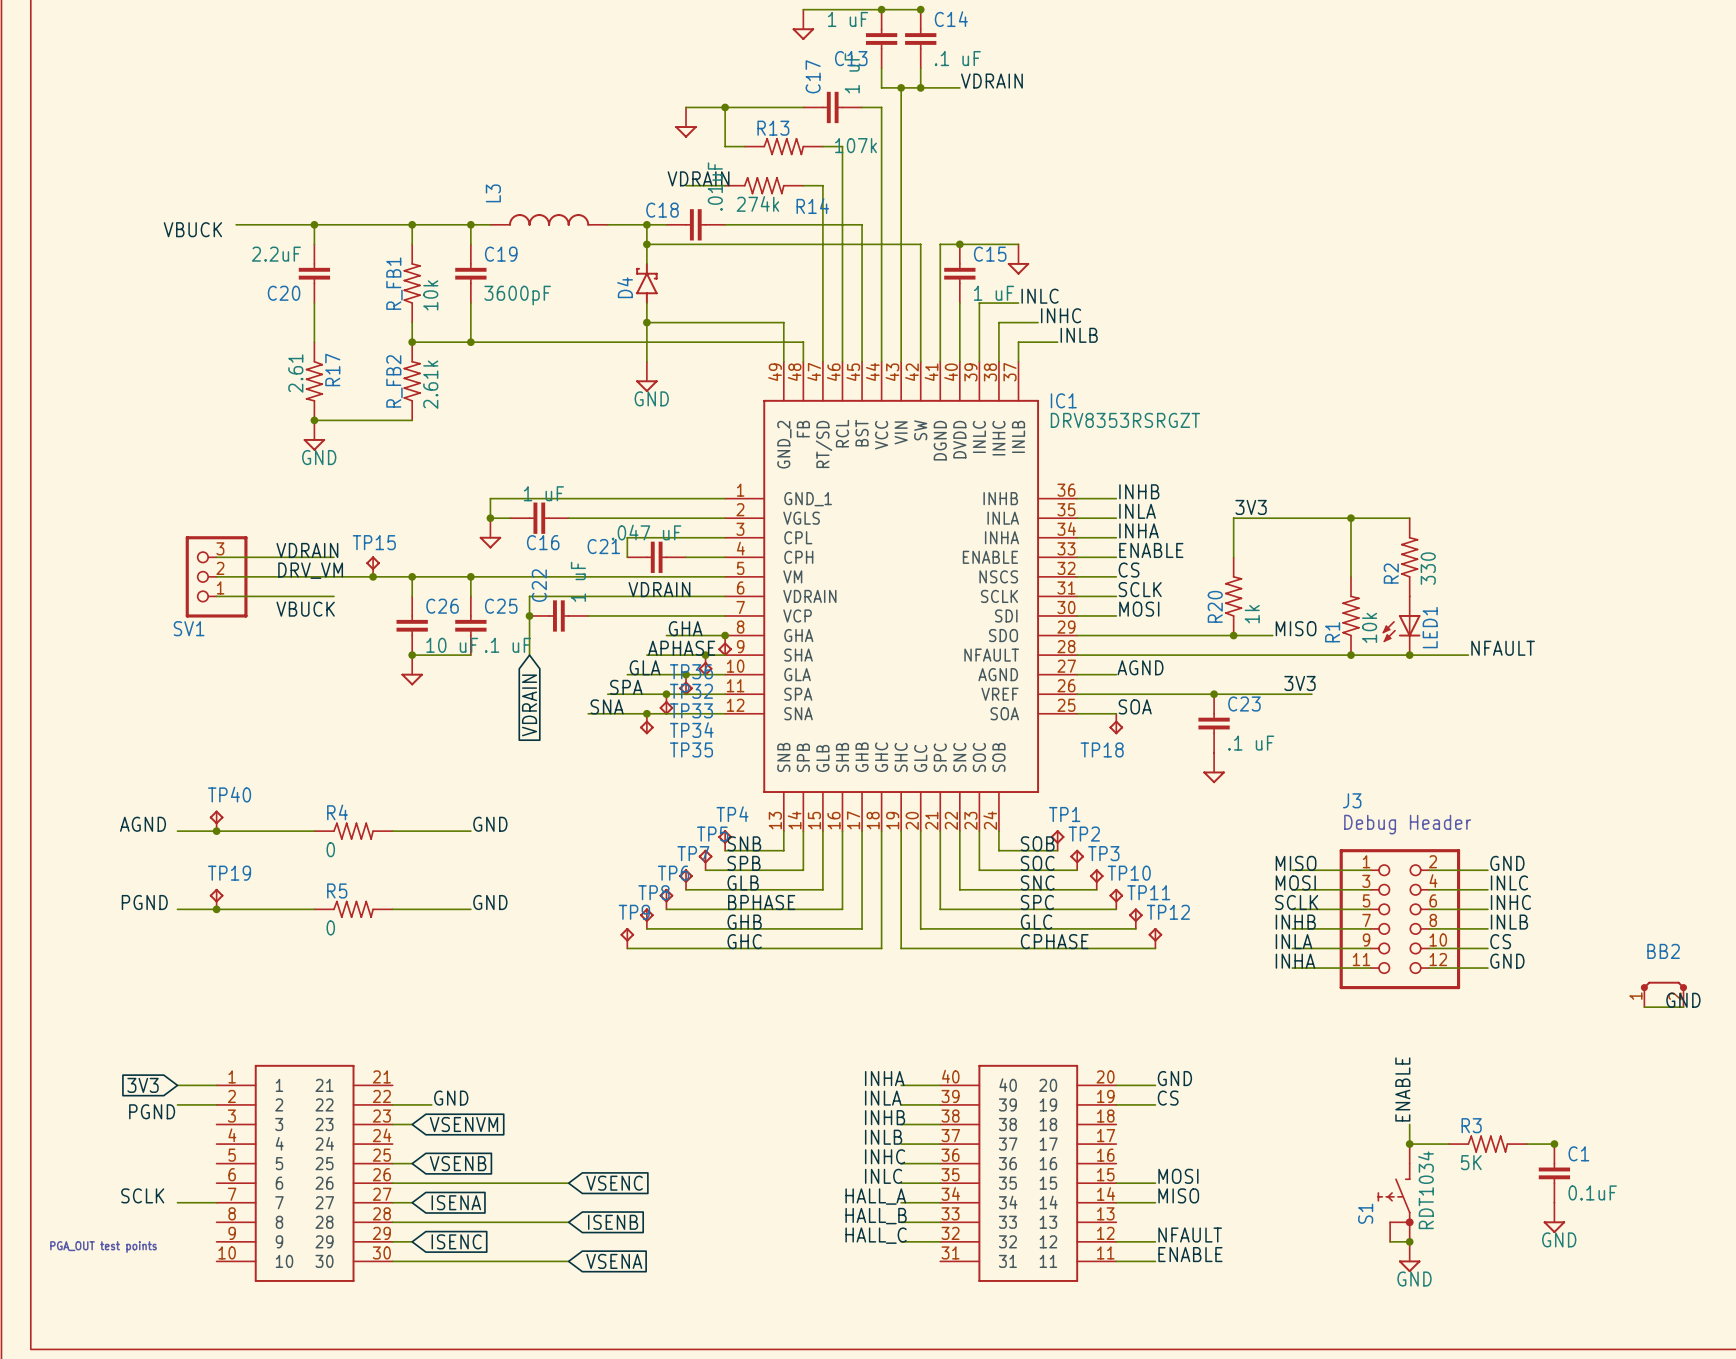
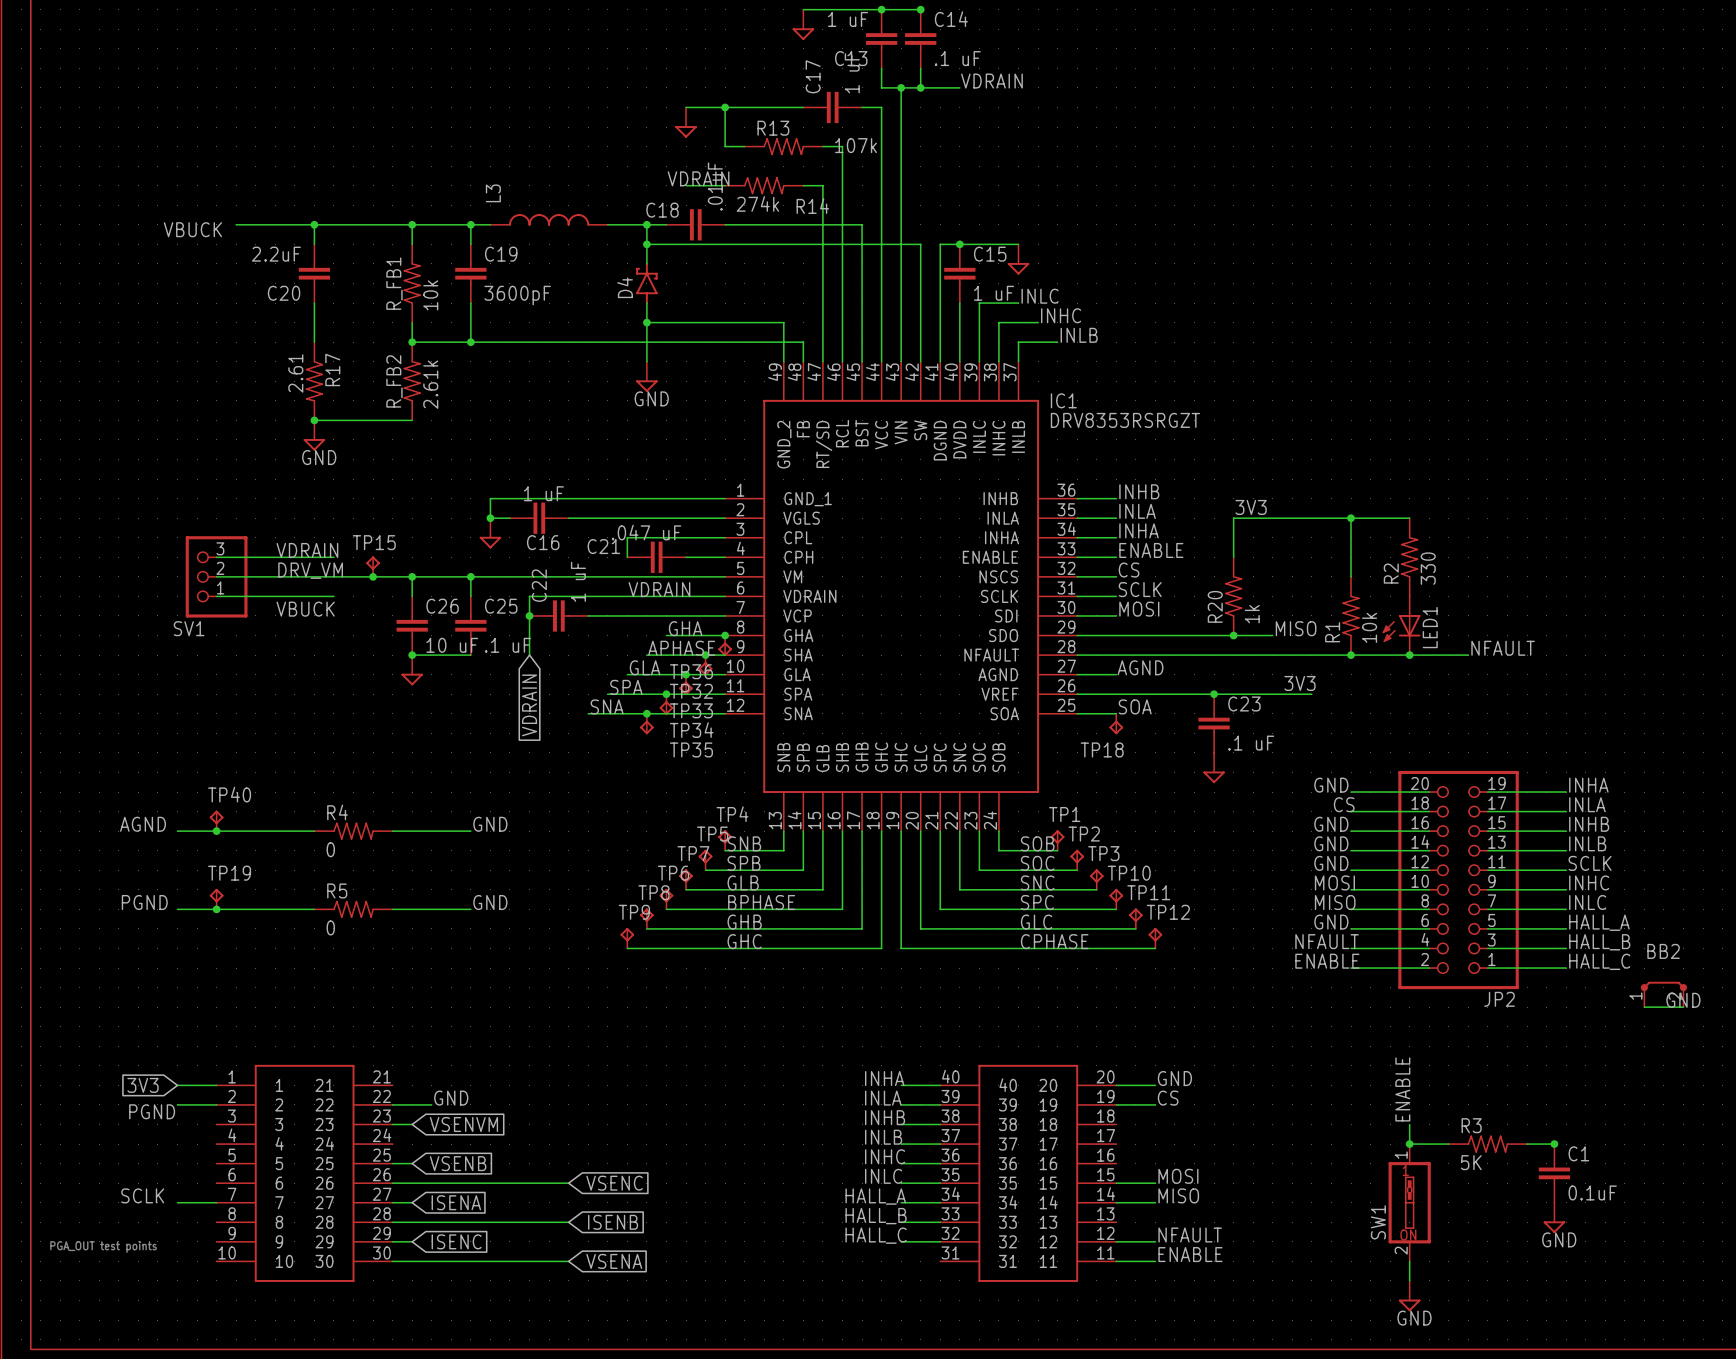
label: none -> GND (1331, 785)
label: none -> INHA (1588, 785)
wire: none -> (1351, 792) (1429, 792)
wire: none -> (1487, 792) (1566, 792)
label: none -> CS (1344, 804)
label: none -> INLA (1587, 804)
wire: none -> (1351, 811) (1429, 811)
wire: none -> (1487, 811) (1566, 811)
label: none -> GND (1331, 824)
text: Debug Header (1407, 824) -> none
label: none -> INHB (1589, 824)
wire: none -> (1351, 831) (1429, 831)
wire: none -> (1487, 831) (1566, 831)
label: none -> GND (1331, 843)
wire: none -> (1487, 850) (1566, 850)
label position: MISO (1296, 863) -> MISO (1335, 902)
label: none -> GND (1331, 863)
label: GND (1507, 863) -> none
label: none -> SCLK (1590, 863)
wire: (1292, 870) (1351, 870) -> none
wire: (1429, 870) (1487, 870) -> (1429, 870) (1370, 870)
wire: none -> (1487, 870) (1566, 870)
JP2: none -> (1458, 880)
label position: MOSI (1295, 882) -> MOSI (1334, 882)
label position: INLC (1509, 882) -> INLC (1587, 902)
wire: (1292, 889) (1351, 889) -> none
wire: (1429, 889) (1487, 889) -> (1429, 889) (1370, 889)
wire: none -> (1487, 889) (1566, 889)
label: SCLK (1296, 902) -> none
label position: INHC (1510, 902) -> INHC (1589, 882)
wire: (1292, 909) (1351, 909) -> none
wire: (1429, 909) (1487, 909) -> (1429, 909) (1370, 909)
wire: none -> (1487, 909) (1566, 909)
J3: (1399, 919) -> none
label: INHB (1295, 922) -> none
label: none -> GND (1331, 922)
label position: INLB (1509, 922) -> INLB (1587, 843)
label: none -> HALL_A (1599, 922)
wire: (1292, 928) (1351, 928) -> none
wire: (1429, 928) (1487, 928) -> (1429, 928) (1370, 928)
wire: none -> (1487, 928) (1566, 928)
label: INLA (1294, 941) -> none
label: none -> NFAULT (1327, 941)
label: CS (1500, 941) -> none
label: none -> HALL_B (1599, 942)
wire: (1292, 948) (1351, 948) -> none
wire: (1429, 948) (1487, 948) -> (1429, 948) (1370, 948)
wire: none -> (1487, 948) (1566, 948)
label: INHA (1295, 961) -> none
label: none -> ENABLE (1327, 961)
label: GND (1507, 961) -> none
label: none -> HALL_C (1599, 961)
wire: (1292, 968) (1351, 968) -> none
wire: (1429, 968) (1487, 968) -> (1429, 968) (1370, 968)
wire: none -> (1487, 968) (1566, 968)
S1: RDT1034 (1395, 1192) -> none
SW1: none -> (1409, 1202)
junction: (1409, 1241) -> none
power symbol position: GND (1409, 1257) -> GND (1409, 1296)
wire: none -> (1409, 1261) (1409, 1280)

